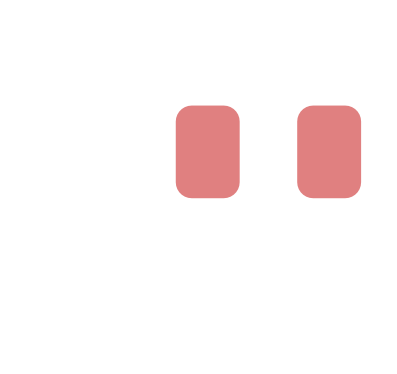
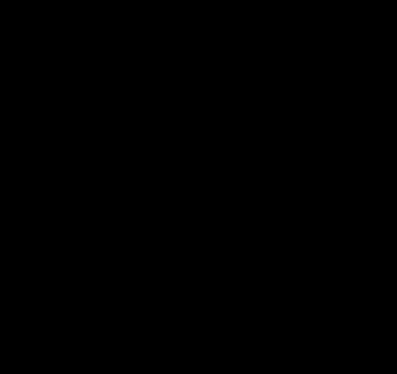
part: (268, 151) -> none

